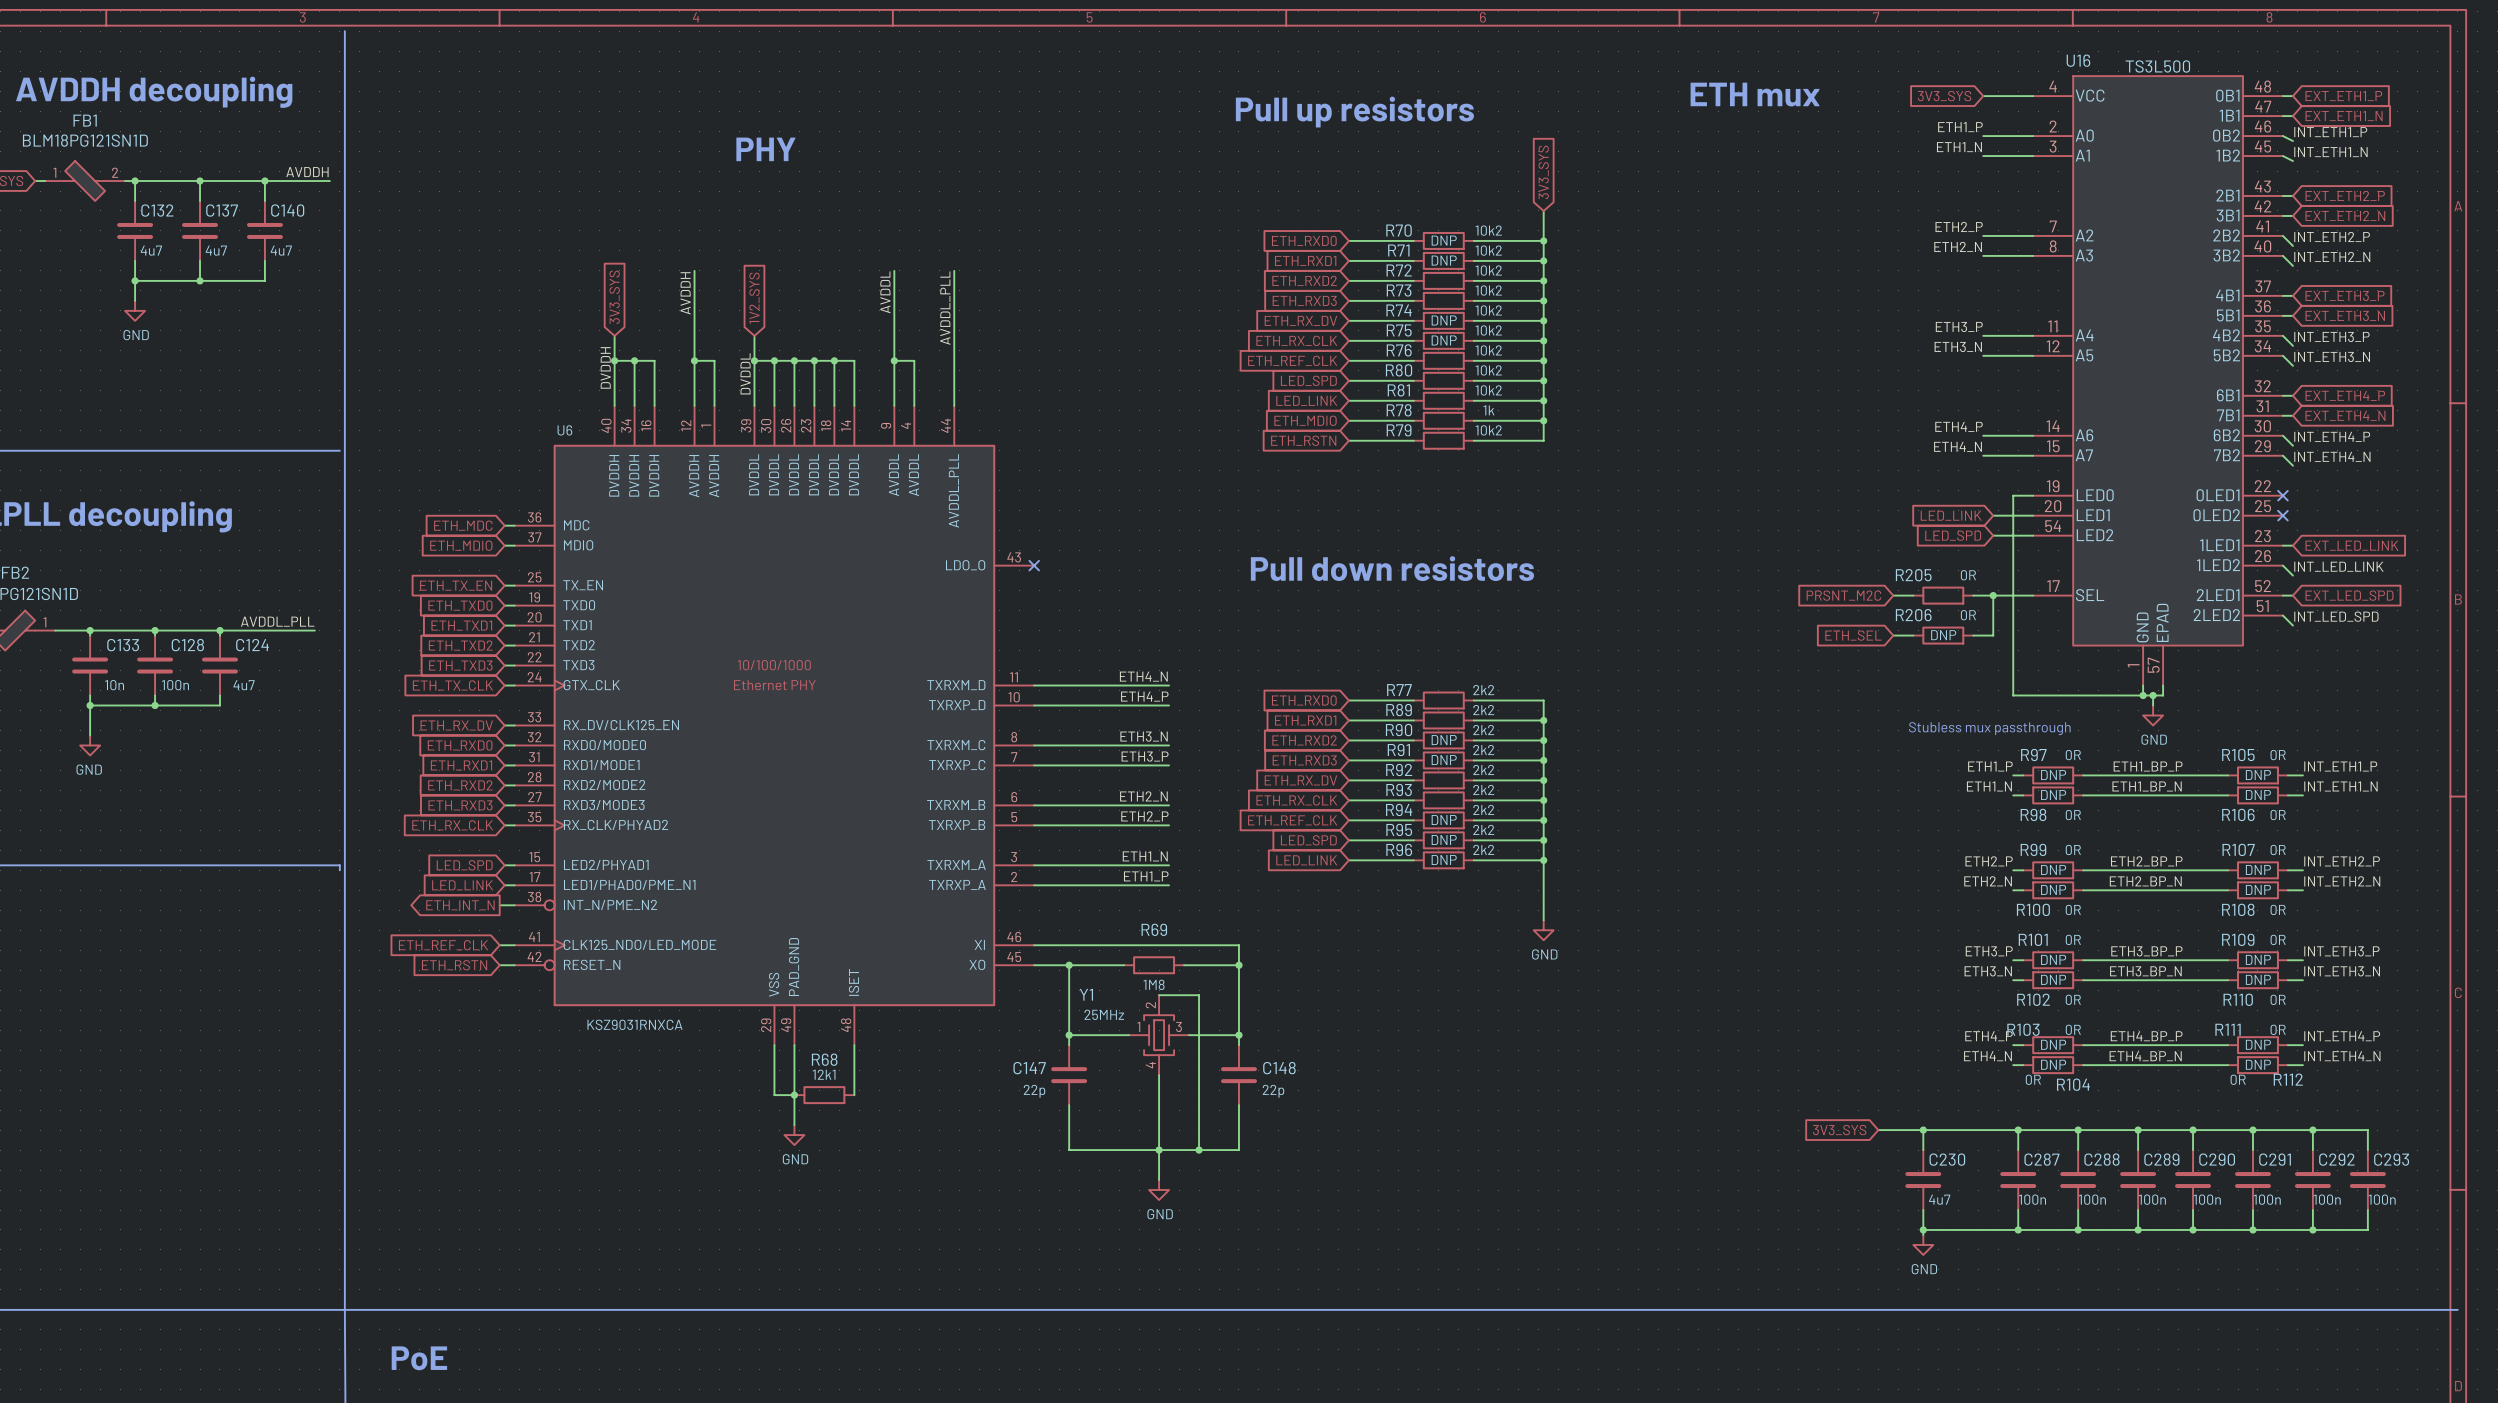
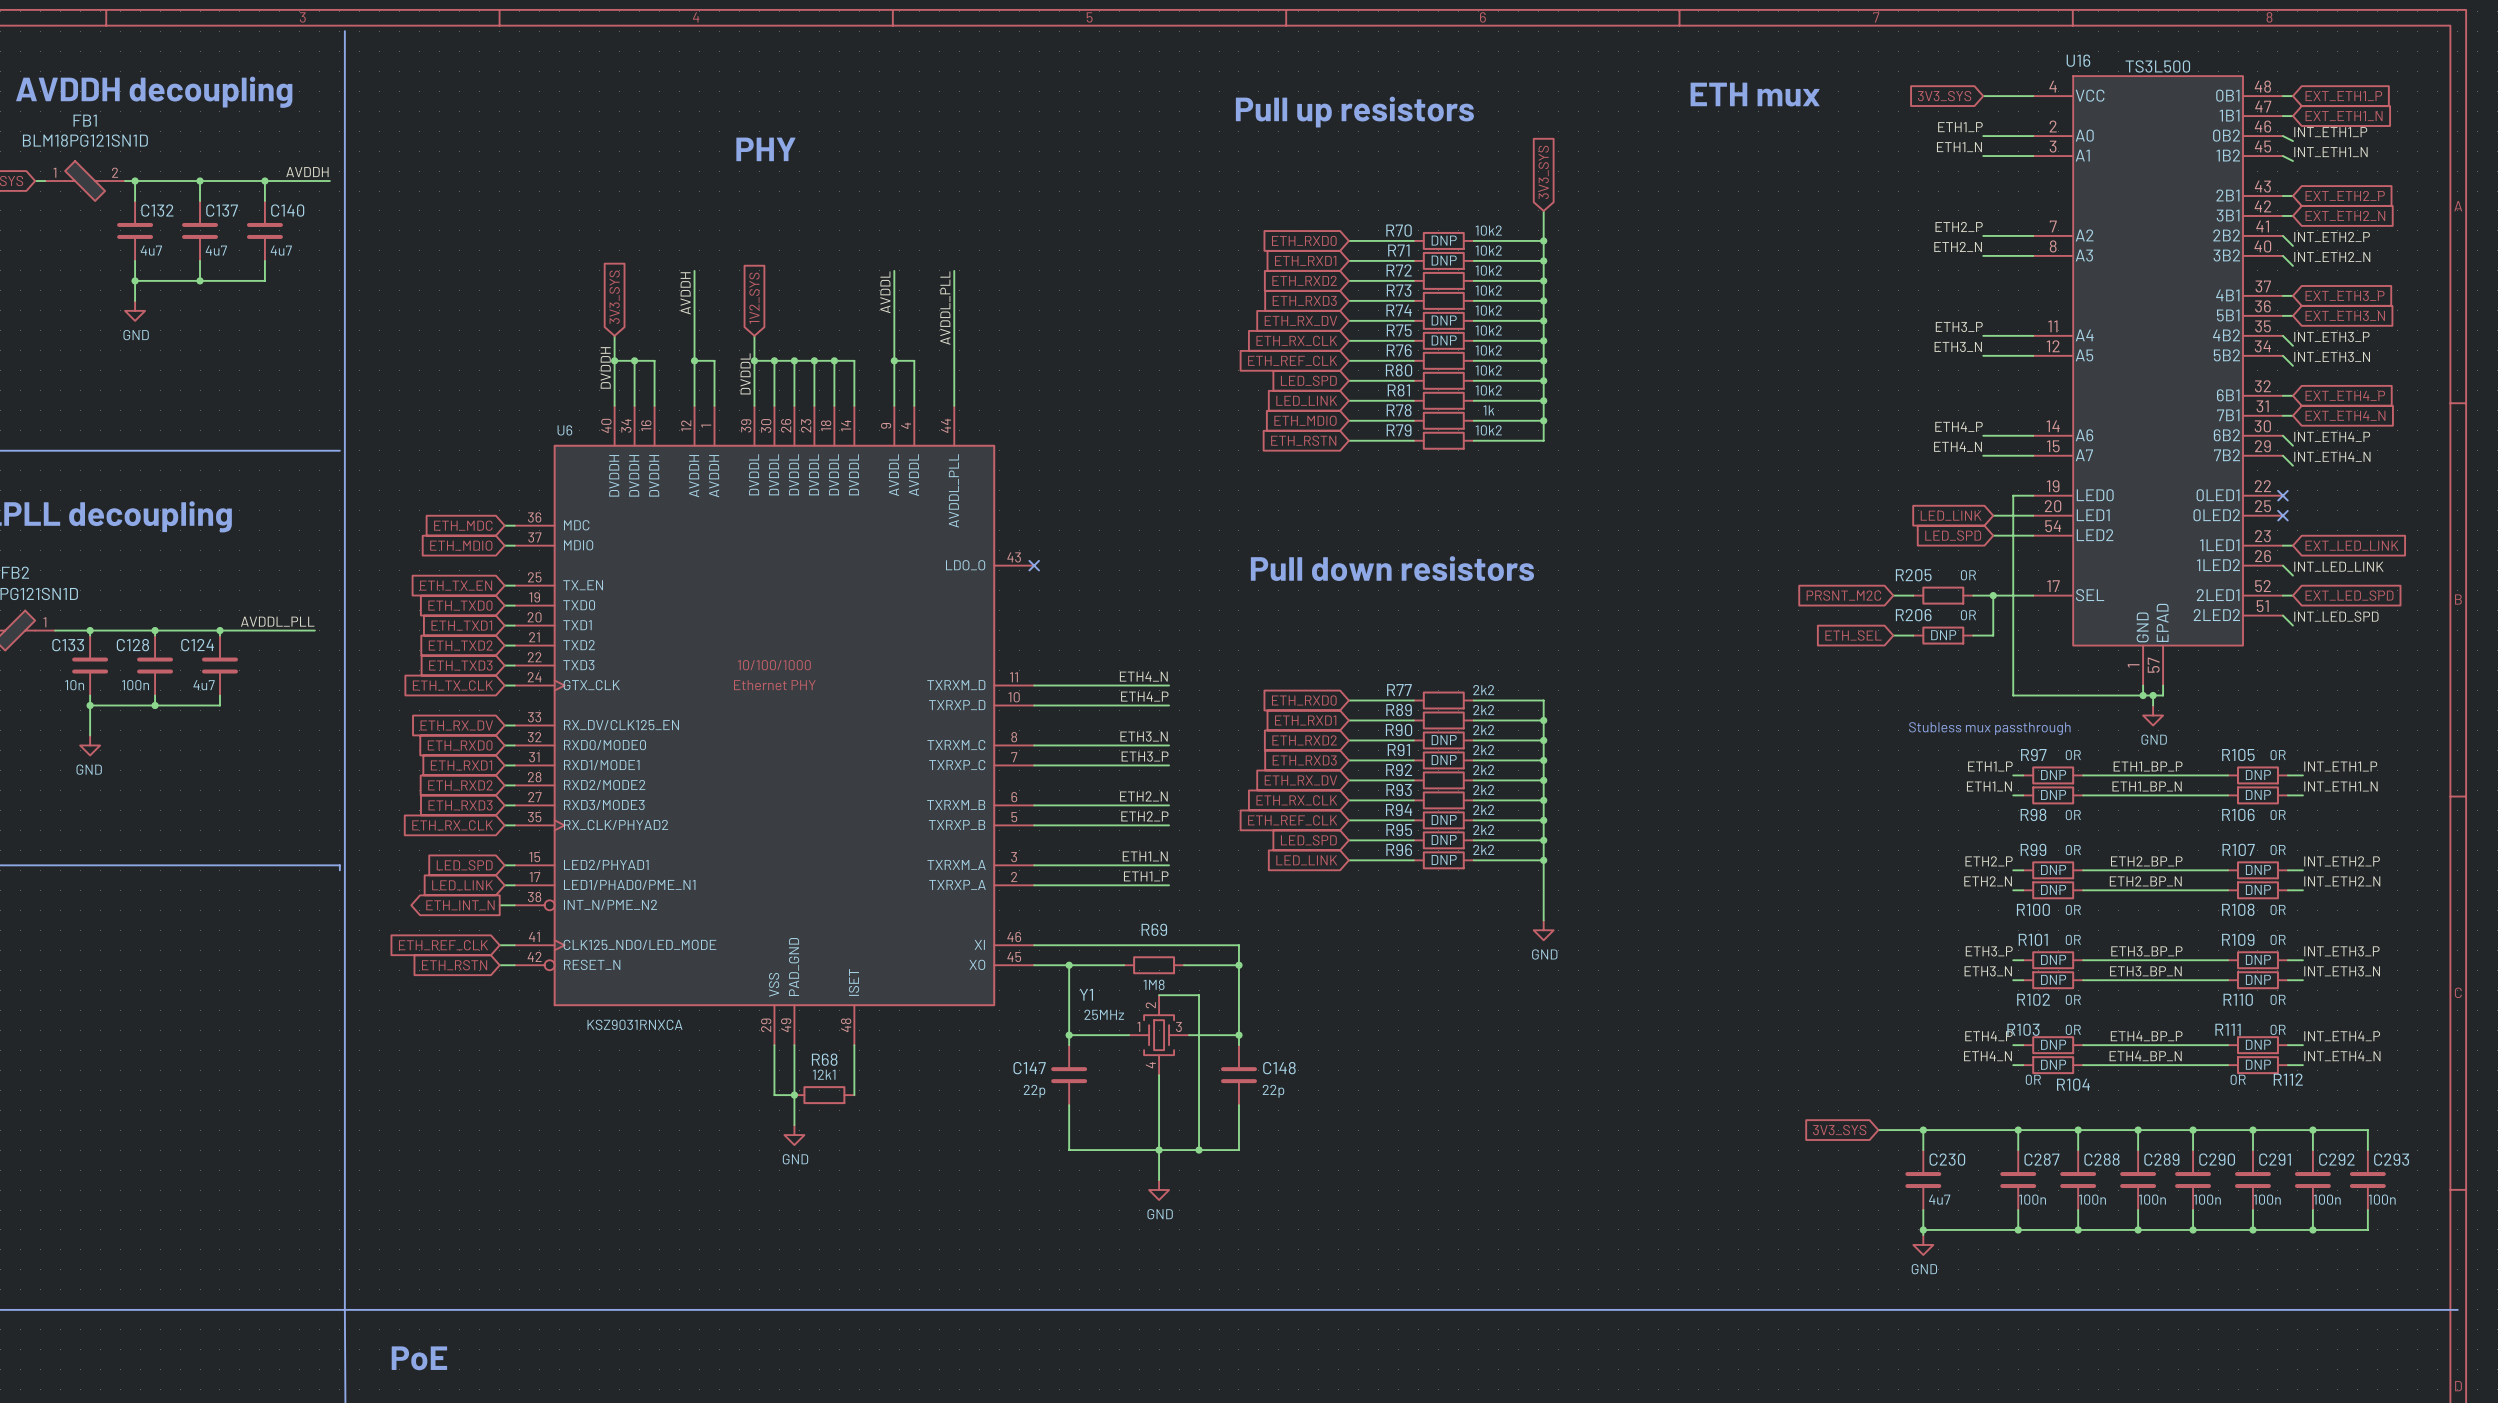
C133 name position: C133 (123, 645) -> C133 (68, 645)
C128 name position: C128 (187, 645) -> C128 (132, 645)
C124 name position: C124 (252, 645) -> C124 (197, 645)
C133 text position: 10n (114, 685) -> 10n (74, 685)
C128 text position: 100n (175, 685) -> 100n (135, 685)
C124 text position: 4u7 (244, 685) -> 4u7 (204, 685)

